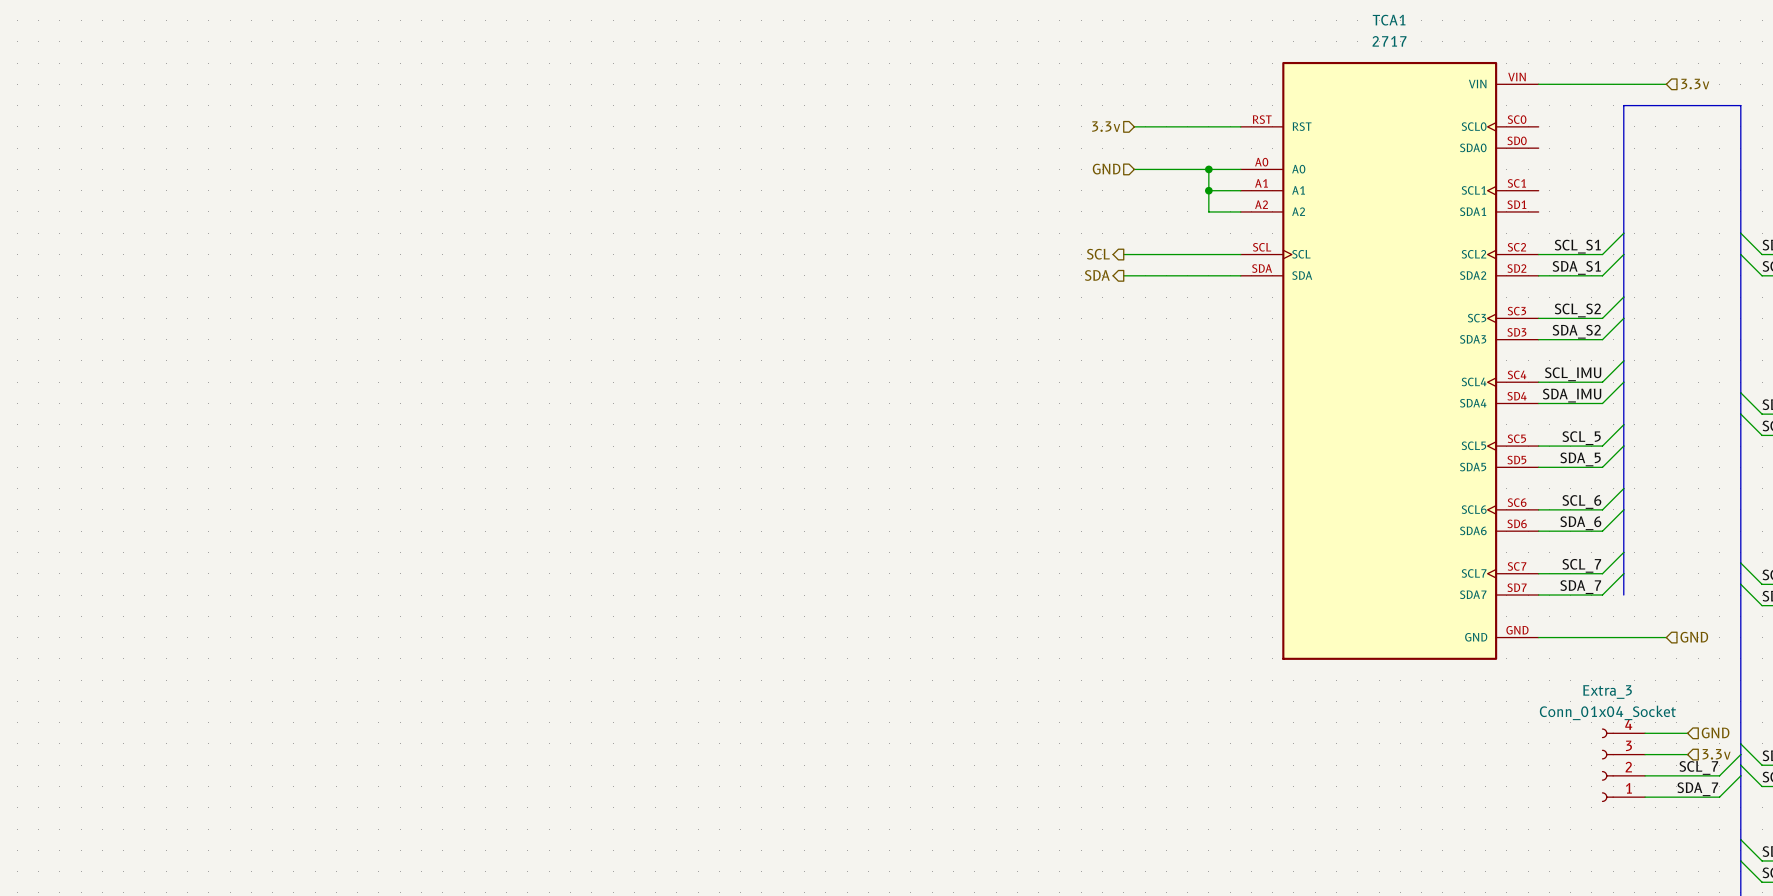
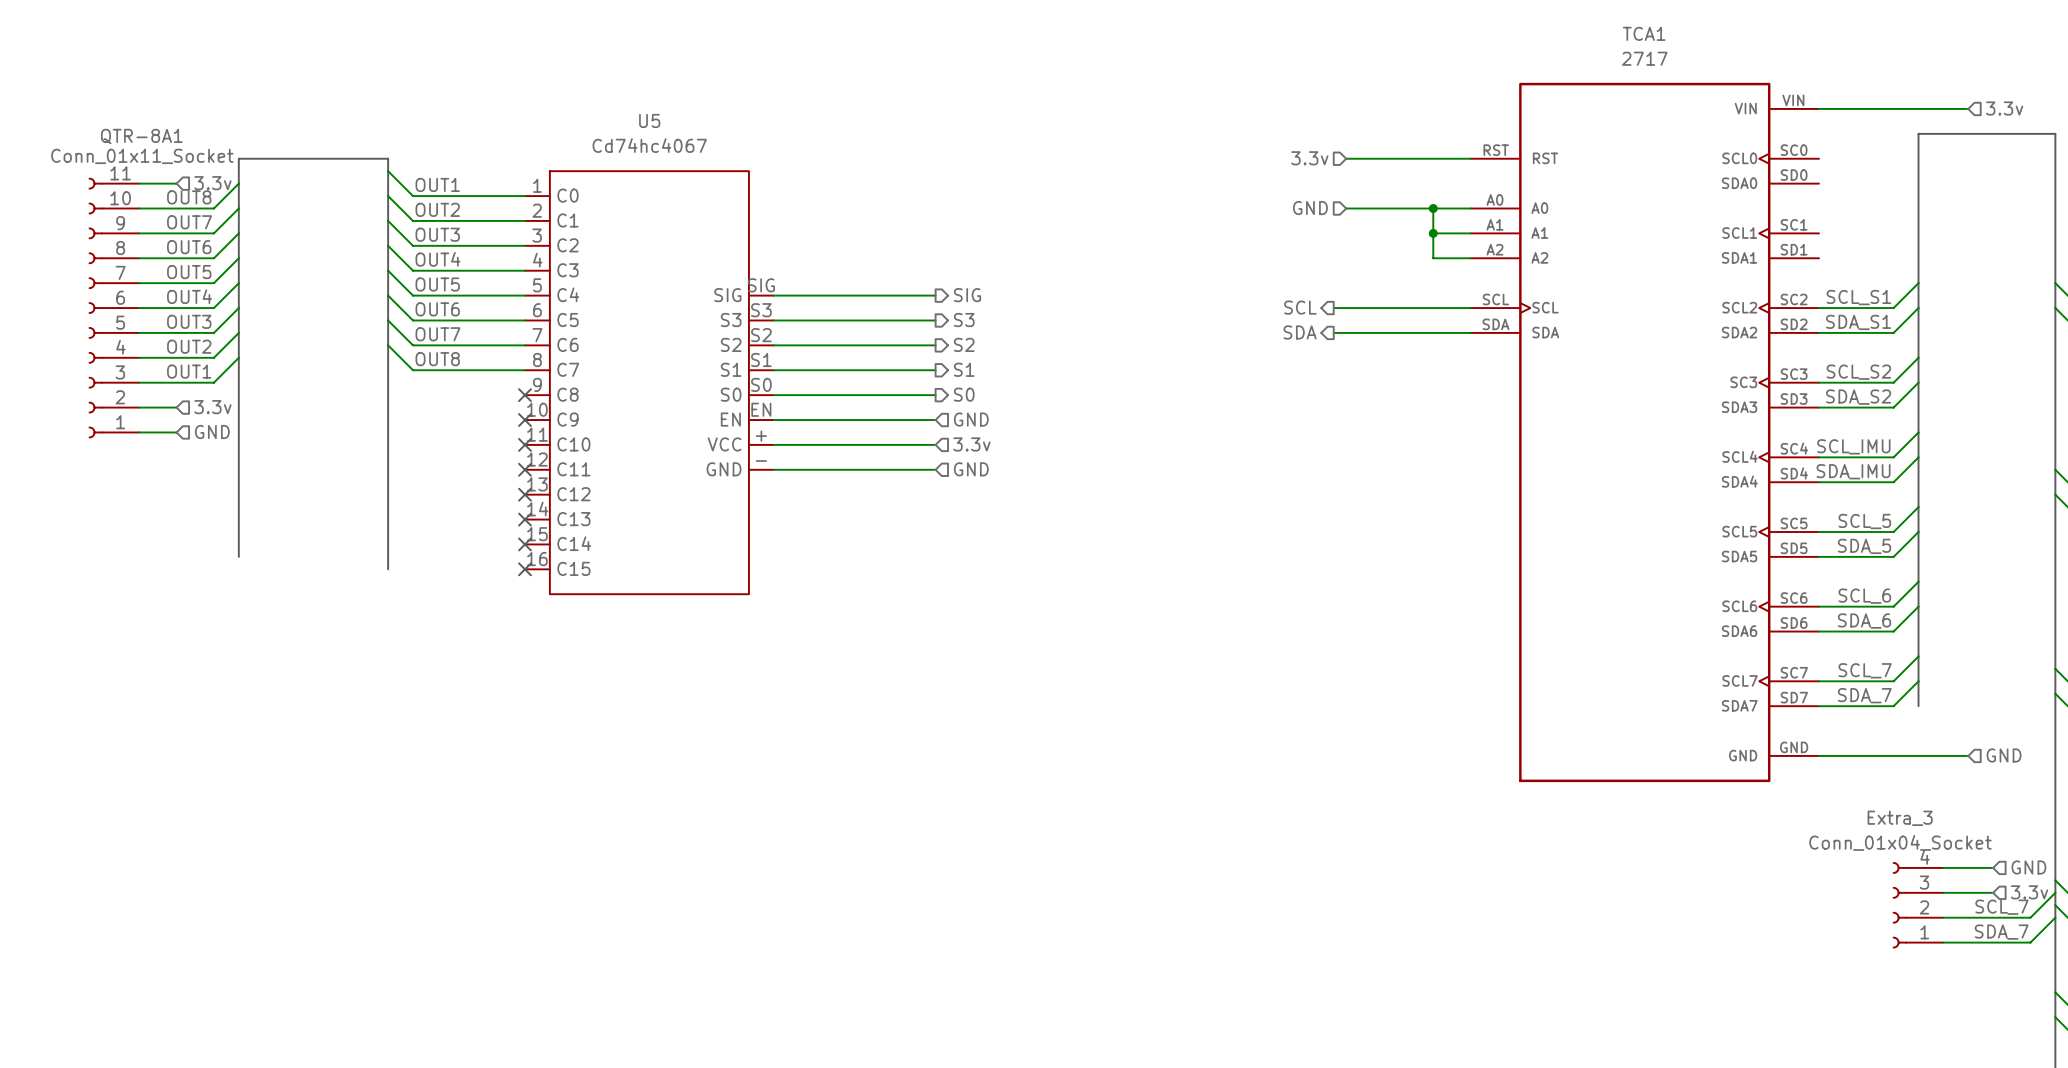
wire: none -> (388, 171) (413, 196) (524, 196)
hierarchical label: none -> 3.3v (212, 183)
wire: none -> (139, 183) (176, 183)
wire: none -> (238, 183) (213, 208) (139, 208)
label: none -> OUT1 (437, 184)
wire: none -> (388, 196) (413, 220) (524, 220)
label: none -> OUT8 (189, 197)
wire: none -> (238, 208) (213, 233) (139, 233)
label: none -> OUT2 (437, 209)
wire: none -> (388, 220) (413, 245) (524, 245)
label: none -> OUT7 (189, 222)
wire: none -> (238, 233) (213, 258) (139, 258)
label: none -> OUT3 (437, 234)
wire: none -> (388, 245) (413, 270) (524, 270)
label: none -> OUT6 (189, 247)
wire: none -> (238, 258) (213, 283) (139, 283)
label: none -> OUT4 (437, 259)
wire: none -> (388, 270) (413, 295) (524, 295)
label: none -> OUT5 (189, 272)
wire: none -> (238, 283) (213, 308) (139, 308)
label: none -> OUT5 (437, 284)
wire: none -> (388, 295) (413, 320) (524, 320)
wire: none -> (773, 295) (935, 295)
hierarchical label: none -> SIG (967, 295)
label: none -> OUT4 (189, 296)
QTR-8A1: none -> Conn_01x11_Socket (114, 308)
wire: none -> (238, 308) (213, 332) (139, 332)
label: none -> OUT6 (437, 309)
hierarchical label: none -> S3 (964, 320)
wire: none -> (388, 320) (413, 345) (524, 345)
wire: none -> (773, 320) (935, 320)
label: none -> OUT3 (189, 321)
wire: none -> (238, 332) (213, 357) (139, 357)
label: none -> OUT7 (437, 334)
wire: none -> (388, 345) (413, 370) (524, 370)
wire: none -> (773, 345) (935, 345)
hierarchical label: none -> S2 (964, 344)
label: none -> OUT2 (189, 346)
wire: none -> (238, 357) (213, 382) (139, 382)
label: none -> OUT8 (437, 359)
wire: none -> (773, 370) (935, 370)
hierarchical label: none -> S1 (964, 369)
label: none -> OUT1 (189, 371)
U5: none -> Cd74hc4067 (649, 382)
hierarchical label: none -> S0 (964, 394)
no-connect mark: none -> (524, 395)
wire: none -> (773, 395) (935, 395)
wire: none -> (139, 407) (176, 407)
hierarchical label: none -> 3.3v (212, 407)
hierarchical label: none -> GND (971, 419)
no-connect mark: none -> (524, 420)
wire: none -> (773, 420) (935, 420)
wire: none -> (139, 432) (176, 432)
hierarchical label: none -> GND (212, 432)
no-connect mark: none -> (524, 444)
wire: none -> (773, 444) (935, 444)
hierarchical label: none -> 3.3v (971, 444)
no-connect mark: none -> (524, 469)
wire: none -> (773, 469) (935, 469)
hierarchical label: none -> GND (971, 469)
no-connect mark: none -> (524, 494)
no-connect mark: none -> (524, 519)
no-connect mark: none -> (524, 544)
bus: none -> (238, 556) (238, 158) (388, 158) (388, 569)
no-connect mark: none -> (524, 569)

